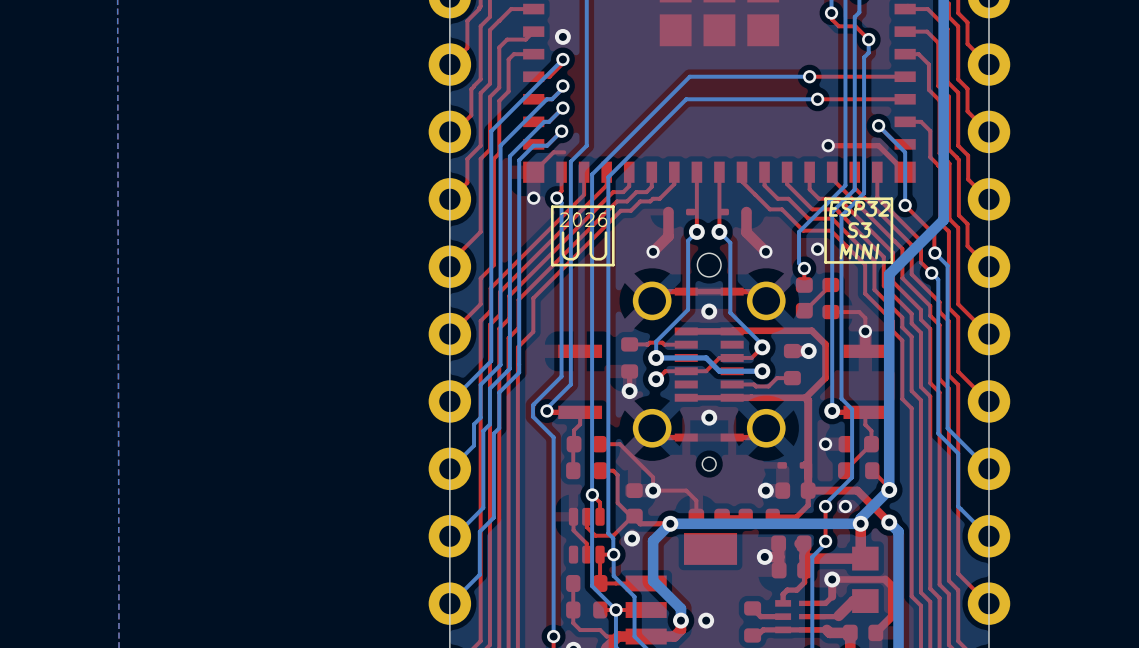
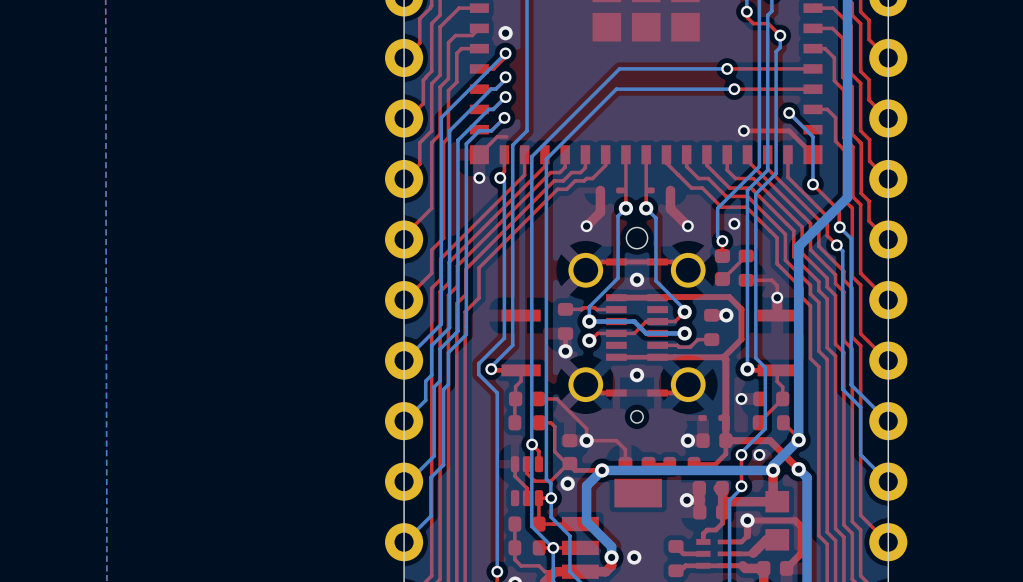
line: (891, 198) (891, 262) (825, 262) (825, 198) (891, 198) -> none
line: (613, 206) (613, 265) (552, 265) (552, 206) (613, 206) -> none
text: ESP32 (859, 208) -> none
text: 2026 (583, 219) -> none
text: S3 (859, 230) -> none
text: UU (584, 245) -> none
text: MINI (859, 251) -> none

